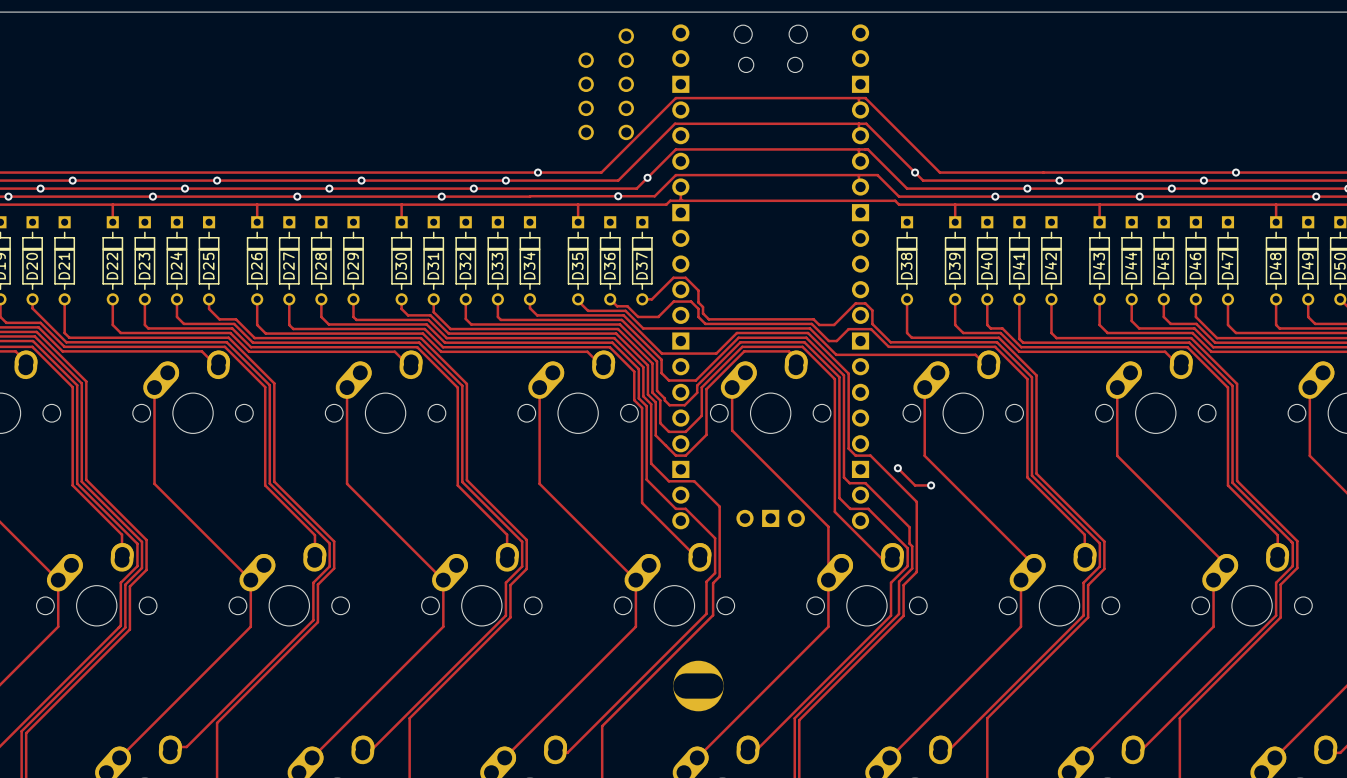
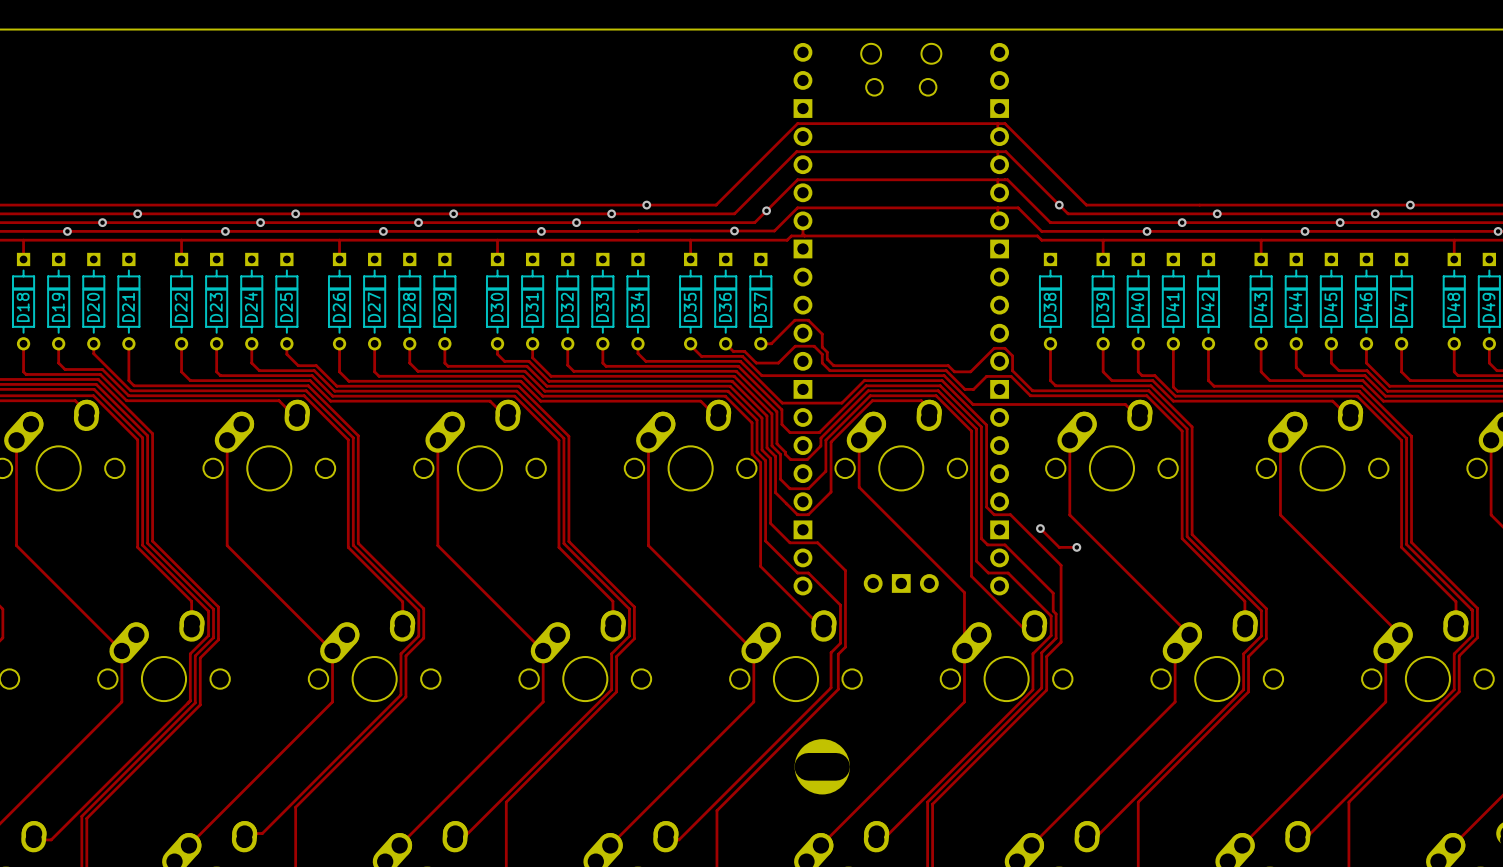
part: (626, 36) -> none
part: (586, 60) -> none
part: (626, 60) -> none
part: (586, 84) -> none
part: (626, 84) -> none
part: (586, 108) -> none
part: (626, 108) -> none
part: (586, 132) -> none
part: (626, 132) -> none

